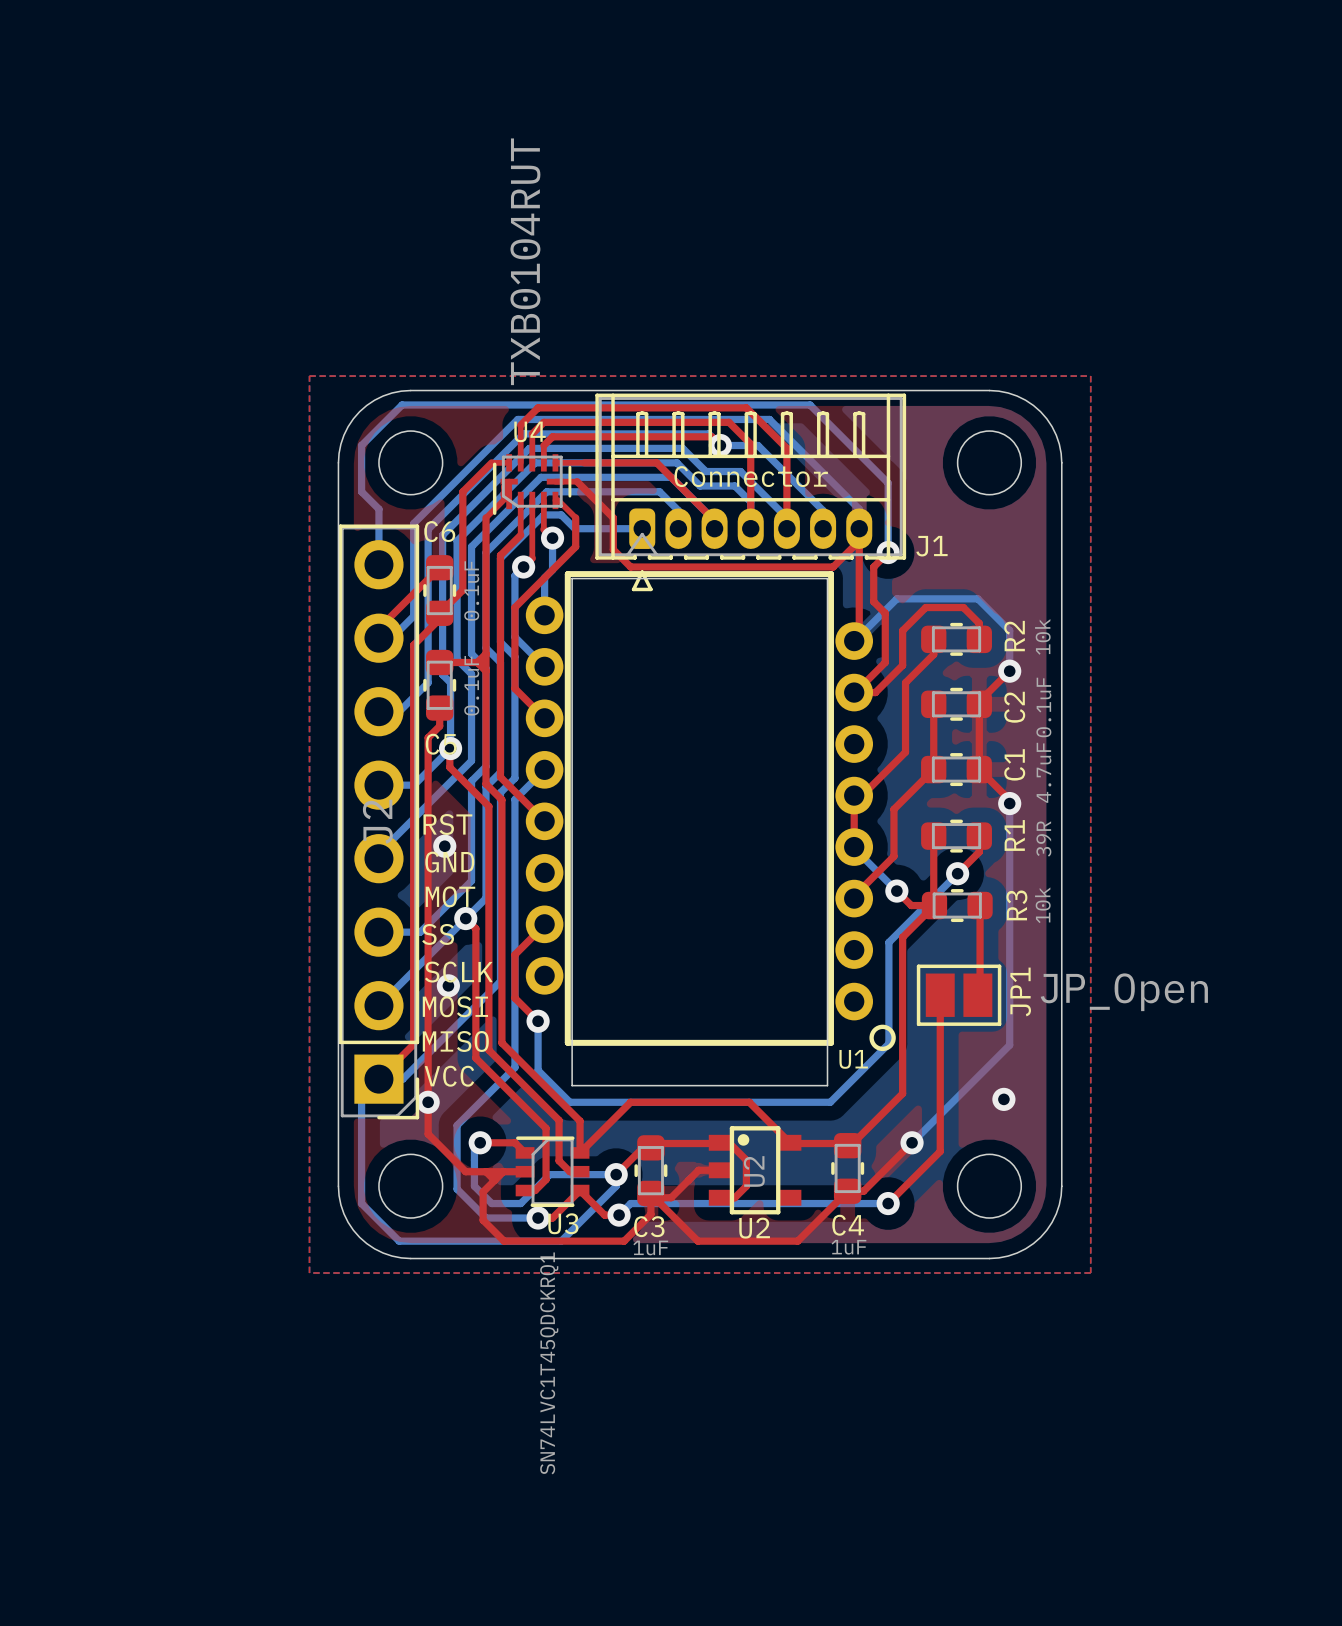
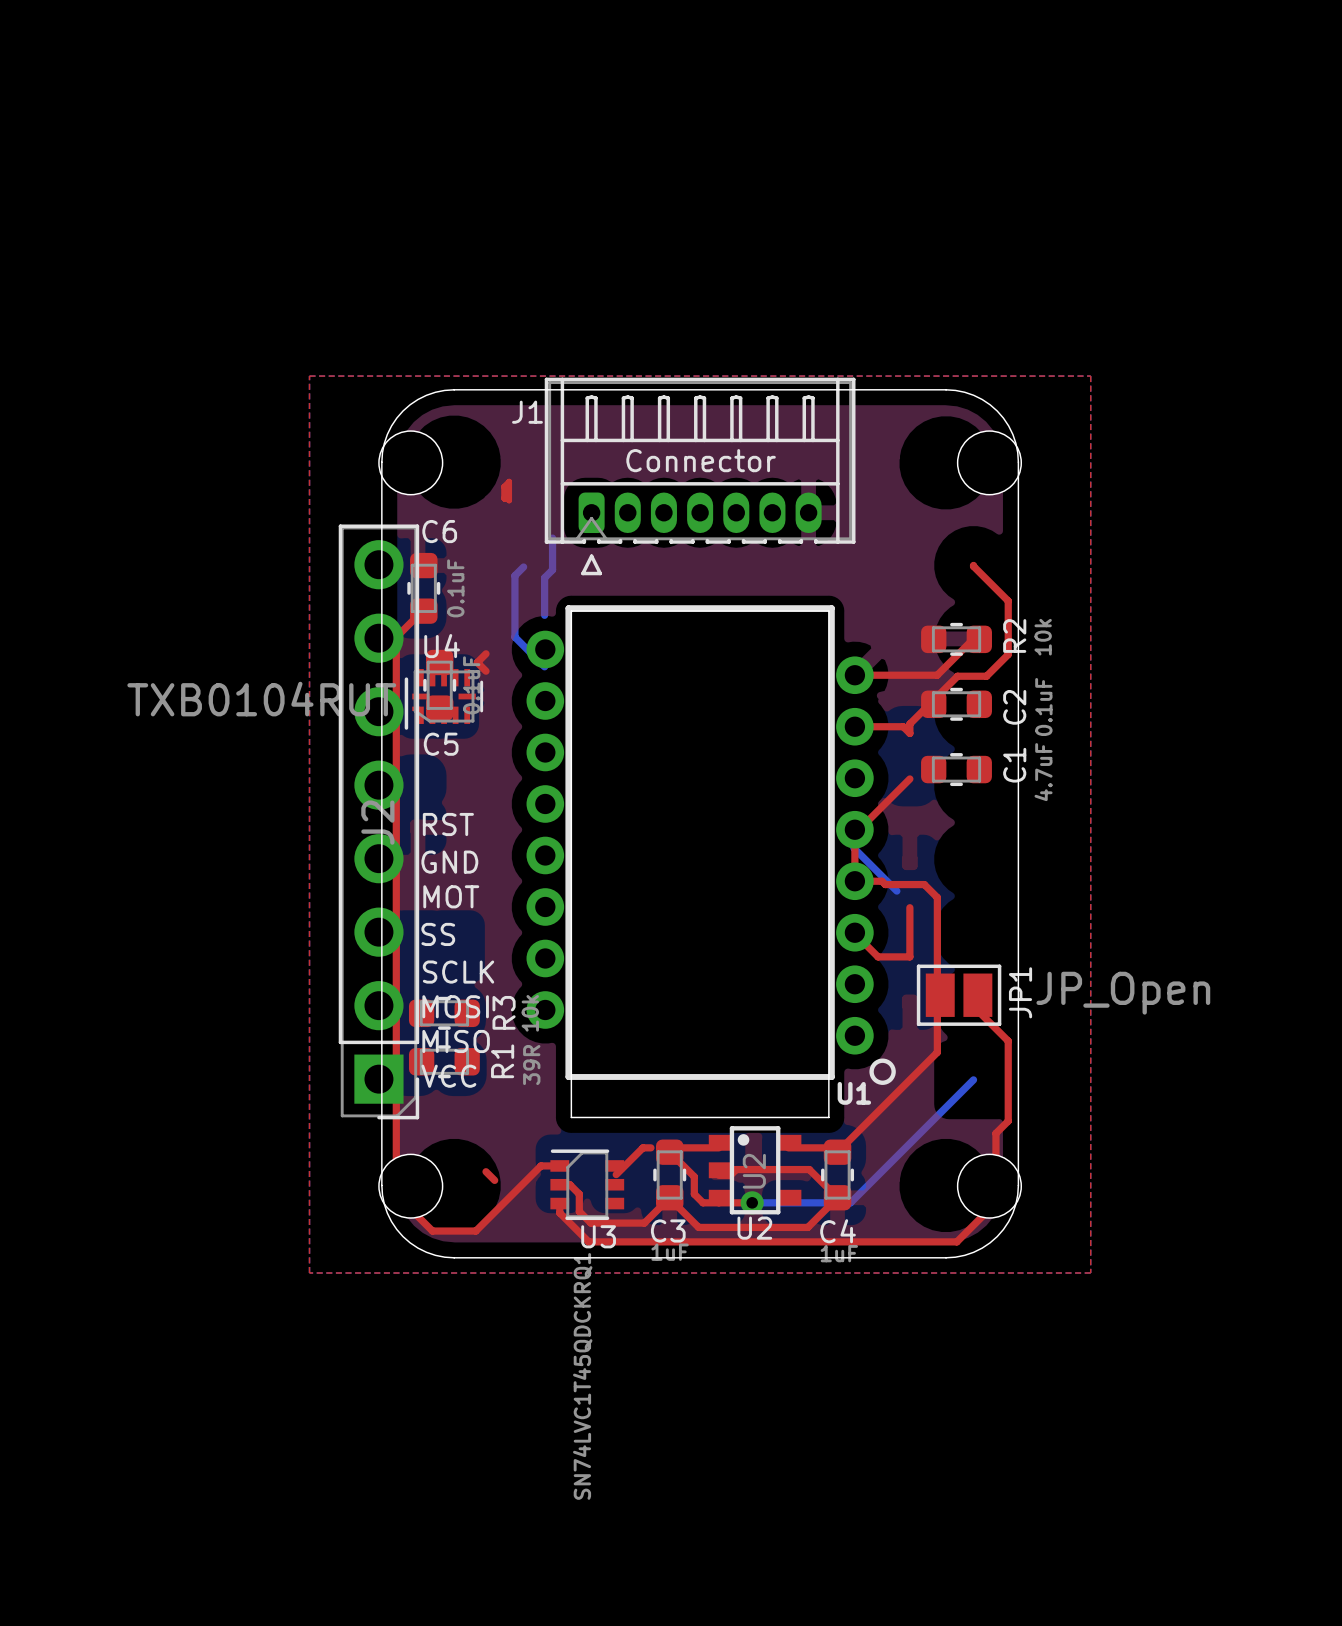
U4 value rotation: 0° (525, 261) -> 90° clockwise (261, 699)
board edge: (410, 390) (989, 390) (1008, 392) (1025, 400) (1046, 418) (1059, 444) (1061, 462) (1061, 1186) (1059, 1204) (1052, 1222) (1033, 1243) (1008, 1256) (989, 1258) (410, 1258) (392, 1256) (374, 1248) (353, 1230) (340, 1204) (338, 1186) (339, 453) (348, 426) (366, 405) (392, 392) (410, 390) -> (454, 389) (435, 392) (410, 404) (391, 425) (382, 452) (381, 1185) (384, 1204) (391, 1221) (403, 1236) (418, 1248) (435, 1255) (454, 1257) (946, 1257) (964, 1255) (982, 1248) (997, 1236) (1008, 1221) (1015, 1204) (1018, 1185) (1018, 462) (1015, 443) (1008, 425) (997, 410) (982, 399) (964, 392) (946, 389) (454, 389)
top track: (720, 445) (711, 436) (552, 436) (543, 445) (543, 462) -> none
via: (720, 445) -> none
top track: (509, 462) (491, 462) (462, 491) (462, 590) (439, 613) -> none
top track: (520, 462) (520, 425) (538, 407) (746, 407) (786, 448) (786, 528) -> none
top track: (532, 462) (532, 433) (543, 422) (729, 422) (750, 444) (750, 528) -> none
top track: (555, 462) (656, 462) (714, 520) (714, 528) -> none
top track: (555, 481) (577, 481) (613, 517) (613, 549) (630, 567) (833, 567) (859, 540) -> none
U4 position: (532, 484) -> (443, 699)
J1 position: (750, 492) -> (700, 476)
top track: (504, 499) (486, 517) (486, 784) (501, 799) (501, 1042) (580, 1121) (580, 1152) (630, 1102) (749, 1102) (790, 1143) (852, 1142) -> none
top track: (520, 500) (520, 535) (500, 555) (500, 777) (544, 821) -> none
top track: (532, 500) (532, 558) (523, 567) -> none
top track: (543, 500) (543, 529) (552, 538) -> none
top track: (555, 500) (558, 500) (575, 517) (575, 546) (514, 607) (514, 688) (544, 718) -> none
bottom track: (642, 528) (574, 528) (561, 514) (543, 514) (500, 558) (500, 642) (514, 656) (514, 778) (500, 792) (500, 981) (402, 1079) (378, 1079) (361, 1096) (361, 1203) (399, 1241) (561, 1241) (616, 1186) (616, 1174) (549, 1174) (520, 1203) (491, 1203) (474, 1186) (474, 1148) (480, 1142) -> none
bottom track: (678, 528) (678, 510) (659, 491) (546, 491) (486, 552) (486, 648) (500, 662) (500, 772) (486, 786) (486, 898) (465, 918) -> none
bottom track: (714, 528) (714, 520) (671, 477) (540, 477) (471, 546) (471, 653) (486, 668) (486, 766) (471, 781) (471, 880) (420, 932) (378, 932) -> none
bottom track: (750, 528) (750, 501) (734, 486) (700, 486) (676, 462) (535, 462) (457, 540) (457, 659) (471, 674) (471, 760) (378, 853) (378, 858) -> none
bottom track: (786, 528) (786, 517) (740, 471) (705, 471) (682, 448) (529, 448) (442, 535) (442, 674) (450, 682) (450, 748) (413, 785) (378, 785) -> none
bottom track: (823, 528) (823, 510) (757, 445) (720, 445) (708, 433) (523, 433) (428, 529) (428, 682) (399, 711) (378, 711) -> none
bottom track: (859, 528) (859, 509) (769, 419) (517, 419) (413, 523) (413, 616) (391, 638) (378, 638) -> none
top track: (859, 528) (859, 636) (854, 641) -> none
via: (552, 538) -> none
J1 name position: J1 (931, 546) -> J1 (527, 412)
bottom track: (888, 552) (888, 483) (810, 404) (402, 404) (361, 445) (361, 491) (378, 509) (378, 564) -> none
top track: (888, 552) (873, 567) (873, 601) (885, 613) (885, 662) (855, 692) -> none
via: (888, 552) -> none
top track: none -> (973, 565) (1008, 601) (1008, 654) (986, 676) (957, 676) (909, 723) (909, 733) (903, 726) (854, 726)
top track: (439, 567) (378, 628) (378, 638) -> none
via: (523, 567) -> none
board edge: (572, 578) (572, 1085) (827, 1085) (827, 578) (572, 578) -> (571, 611) (571, 1117) (828, 1117) (828, 611) (571, 611)
C6 position: (439, 590) -> (423, 588)
top track: none -> (423, 611) (396, 637) (396, 1194) (432, 1231) (475, 1231) (540, 1165) (559, 1165)
top track: (439, 613) (439, 619) (413, 645) (413, 1044) (378, 1079) -> none
top track: none -> (973, 638) (937, 675) (854, 675)
top track: (933, 639) (933, 654) (905, 682) (905, 752) (862, 795) (854, 795) (854, 847) -> none
top track: (979, 639) (979, 623) (963, 607) (925, 607) (902, 630) (902, 665) (875, 692) (854, 692) -> none
bottom track: (854, 641) (896, 598) (977, 598) (1009, 630) (1009, 671) -> none
top track: (439, 662) (477, 662) -> none
top track: (1009, 671) (979, 701) (979, 769) (1009, 799) (1009, 803) -> none
via: (1009, 671) -> none
top track: (933, 704) (933, 769) (893, 809) (893, 856) (854, 896) (854, 898) -> none
top track: (439, 708) (439, 726) (428, 737) (428, 1134) (465, 1171) (525, 1171) -> none
top track: (450, 748) (449, 767) (488, 806) (488, 1050) (559, 1120) (559, 1160) (569, 1171) (580, 1171) -> none
via: (450, 748) -> none
bottom track: (544, 769) (514, 799) (514, 1067) (457, 1125) (457, 1189) (486, 1218) (538, 1218) -> none
top track: none -> (909, 778) (859, 829) (854, 829) (854, 881) (881, 881) (885, 884) (924, 884) (937, 897) (937, 1052) (837, 1152) (833, 1147) (788, 1147)
bottom track: (1009, 803) (1009, 1045) (912, 1142) -> none
via: (1009, 803) -> none
U1 position: (699, 808) -> (700, 842)
top track: (933, 836) (934, 905) -> none
R1 position: (956, 836) -> (444, 1061)
top track: (979, 836) (979, 852) (957, 873) -> none
via: (444, 846) -> none
bottom track: (957, 873) (888, 942) (888, 1043) (830, 1102) (569, 1102) (538, 1070) (538, 1021) -> none
via: (957, 873) -> none
top track: (896, 891) (911, 905) (934, 905) -> none
via: (896, 891) -> none
top track: (934, 905) (902, 937) (902, 1093) (850, 1145) (847, 1145) -> none
R3 position: (957, 905) -> (444, 1013)
top track: (980, 905) (980, 993) (977, 995) -> none
top track: none -> (909, 907) (909, 956) (878, 956) (854, 932)
bottom track: (465, 918) (378, 1005) -> none
top track: (465, 918) (475, 928) (475, 1058) (546, 1128) (546, 1179) (535, 1190) (525, 1190) -> none
via: (465, 918) -> none
top track: (542, 924) (544, 925) (514, 954) (514, 998) (538, 1021) -> none
via: (448, 985) -> none
top track: (940, 995) (940, 1151) (888, 1203) -> none
top track: none -> (973, 1006) (1008, 1041) (1008, 1121) (995, 1133) (995, 1202) (956, 1241) (588, 1241) (559, 1212) (559, 1203)
via: (538, 1021) -> none
drawing position: (882, 1037) -> (882, 1071)
bottom track: none -> (973, 1079) (850, 1202) (752, 1202)
via: (1003, 1099) -> none
via: (428, 1102) -> none
top track: (480, 1142) (514, 1142) (525, 1152) -> none
via: (480, 1142) -> none
top track: (912, 1142) (863, 1191) (847, 1191) -> none
via: (912, 1142) -> none
top track: (650, 1143) (729, 1142) (746, 1160) (746, 1186) (734, 1197) (720, 1197) -> none
top track: none -> (718, 1147) (674, 1147) (669, 1152) (694, 1176) (694, 1194) (703, 1202) (752, 1202)
C4 position: (847, 1168) -> (837, 1174)
C3 position: (650, 1170) -> (669, 1174)
top track: (720, 1170) (698, 1170) (671, 1197) (650, 1197) -> none
top track: (503, 1171) (483, 1191) (483, 1220) (504, 1241) (624, 1241) (650, 1214) (650, 1193) -> none
U3 position: (552, 1171) -> (587, 1184)
via: (616, 1174) -> none
top track: none -> (718, 1175) (730, 1175) (736, 1169) (809, 1169) (837, 1197) (807, 1227) (698, 1227) (669, 1197) (644, 1223) (590, 1223) (579, 1211) (579, 1194) (569, 1184) (559, 1184)
top track: (847, 1191) (797, 1241) (697, 1241) (650, 1194) -> none
via: none -> (752, 1202)
bottom track: (888, 1203) (630, 1203) (619, 1215) -> none
via: (888, 1203) -> none
top track: (619, 1215) (604, 1215) (580, 1190) (552, 1218) (538, 1218) -> none
via: (619, 1215) -> none
via: (538, 1218) -> none

